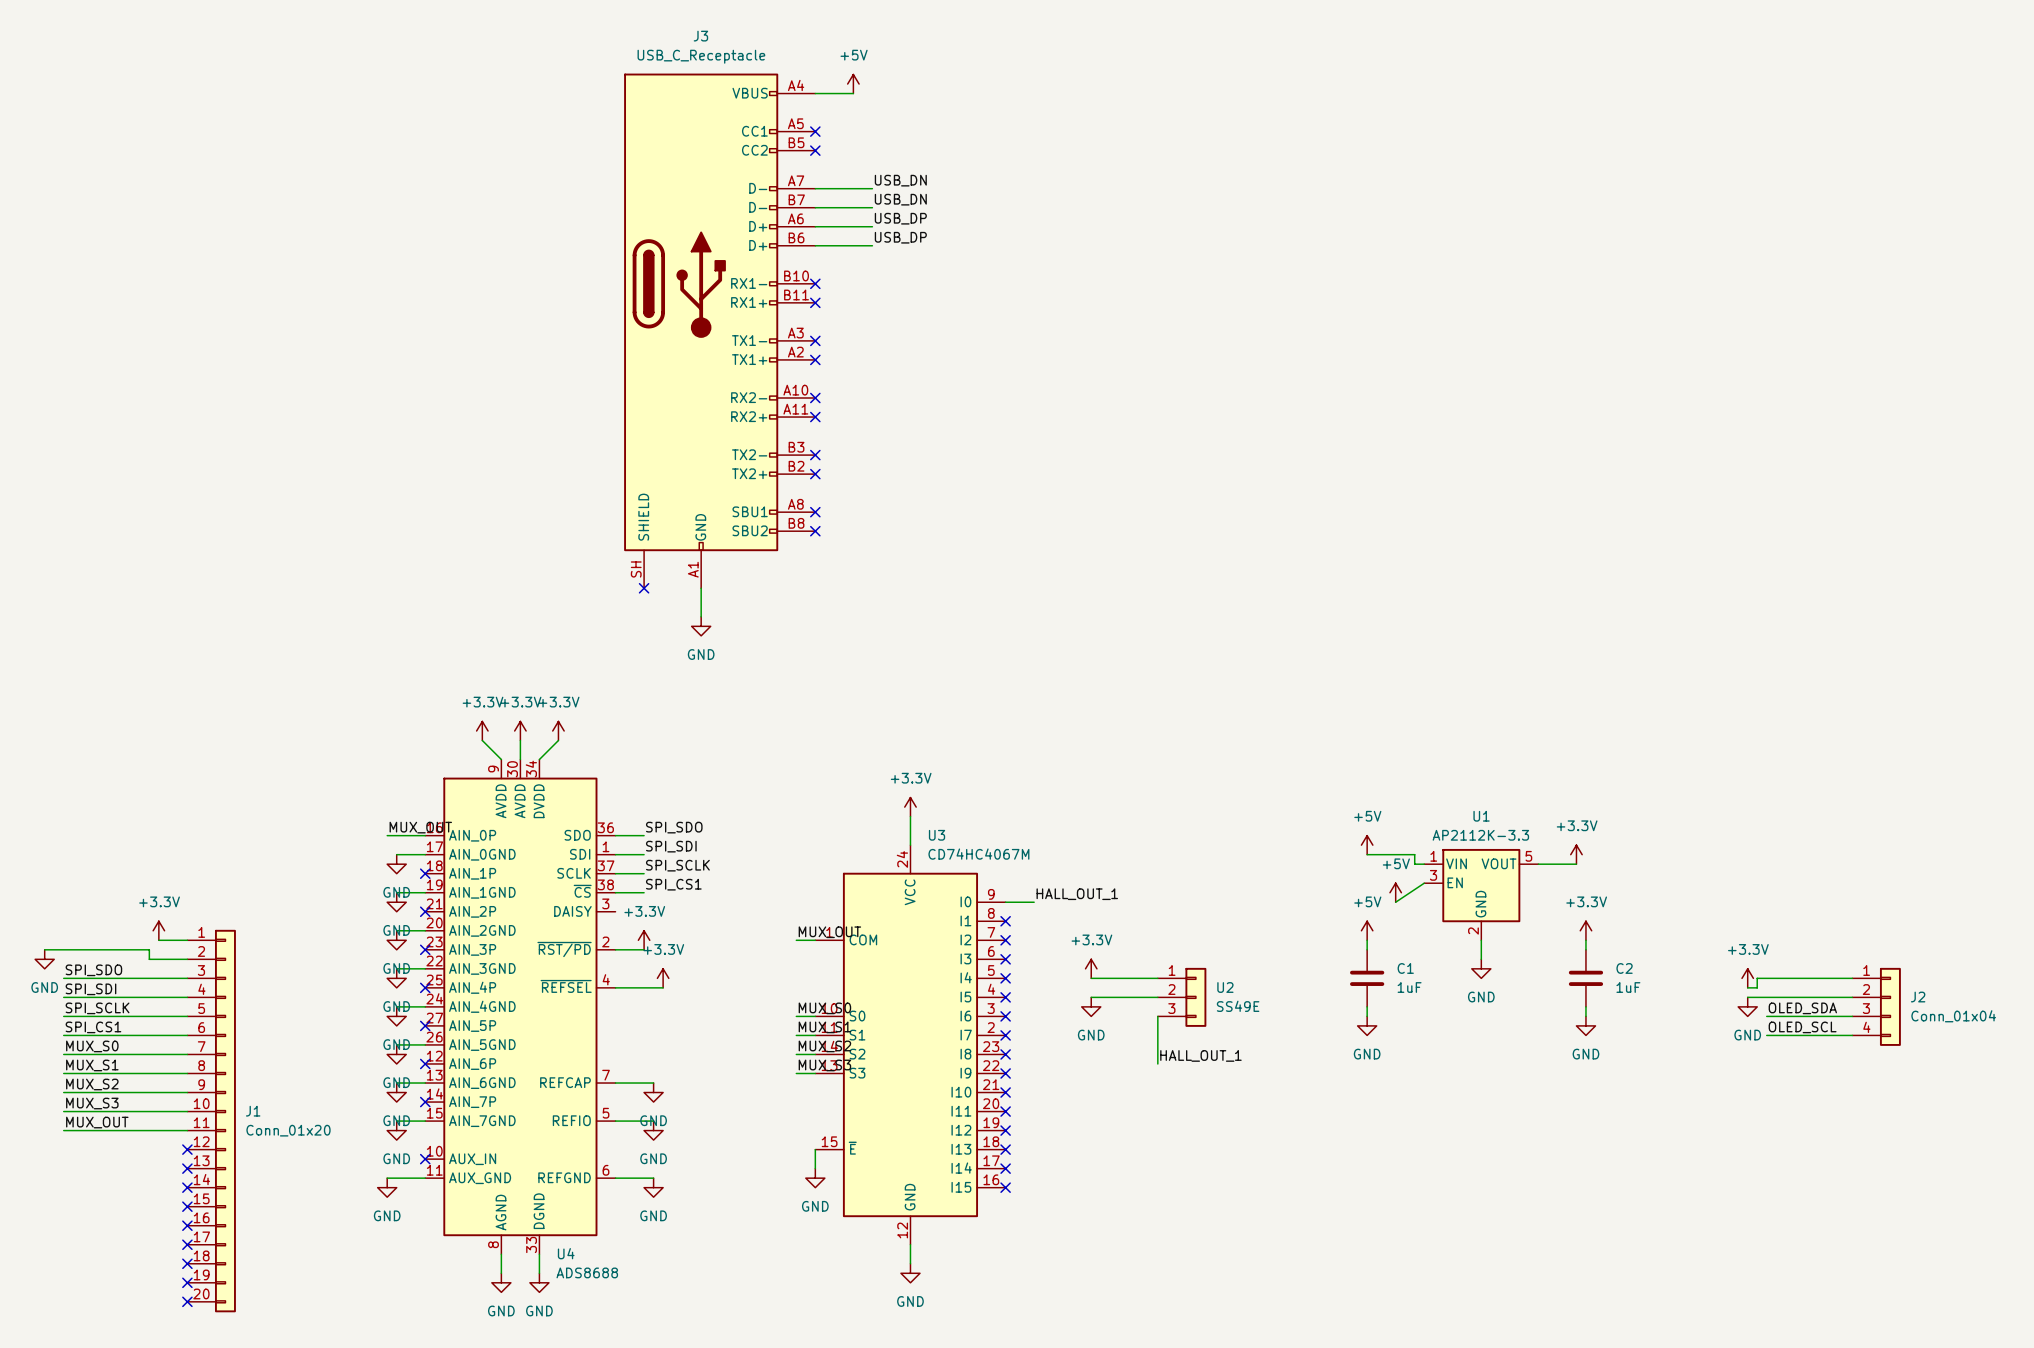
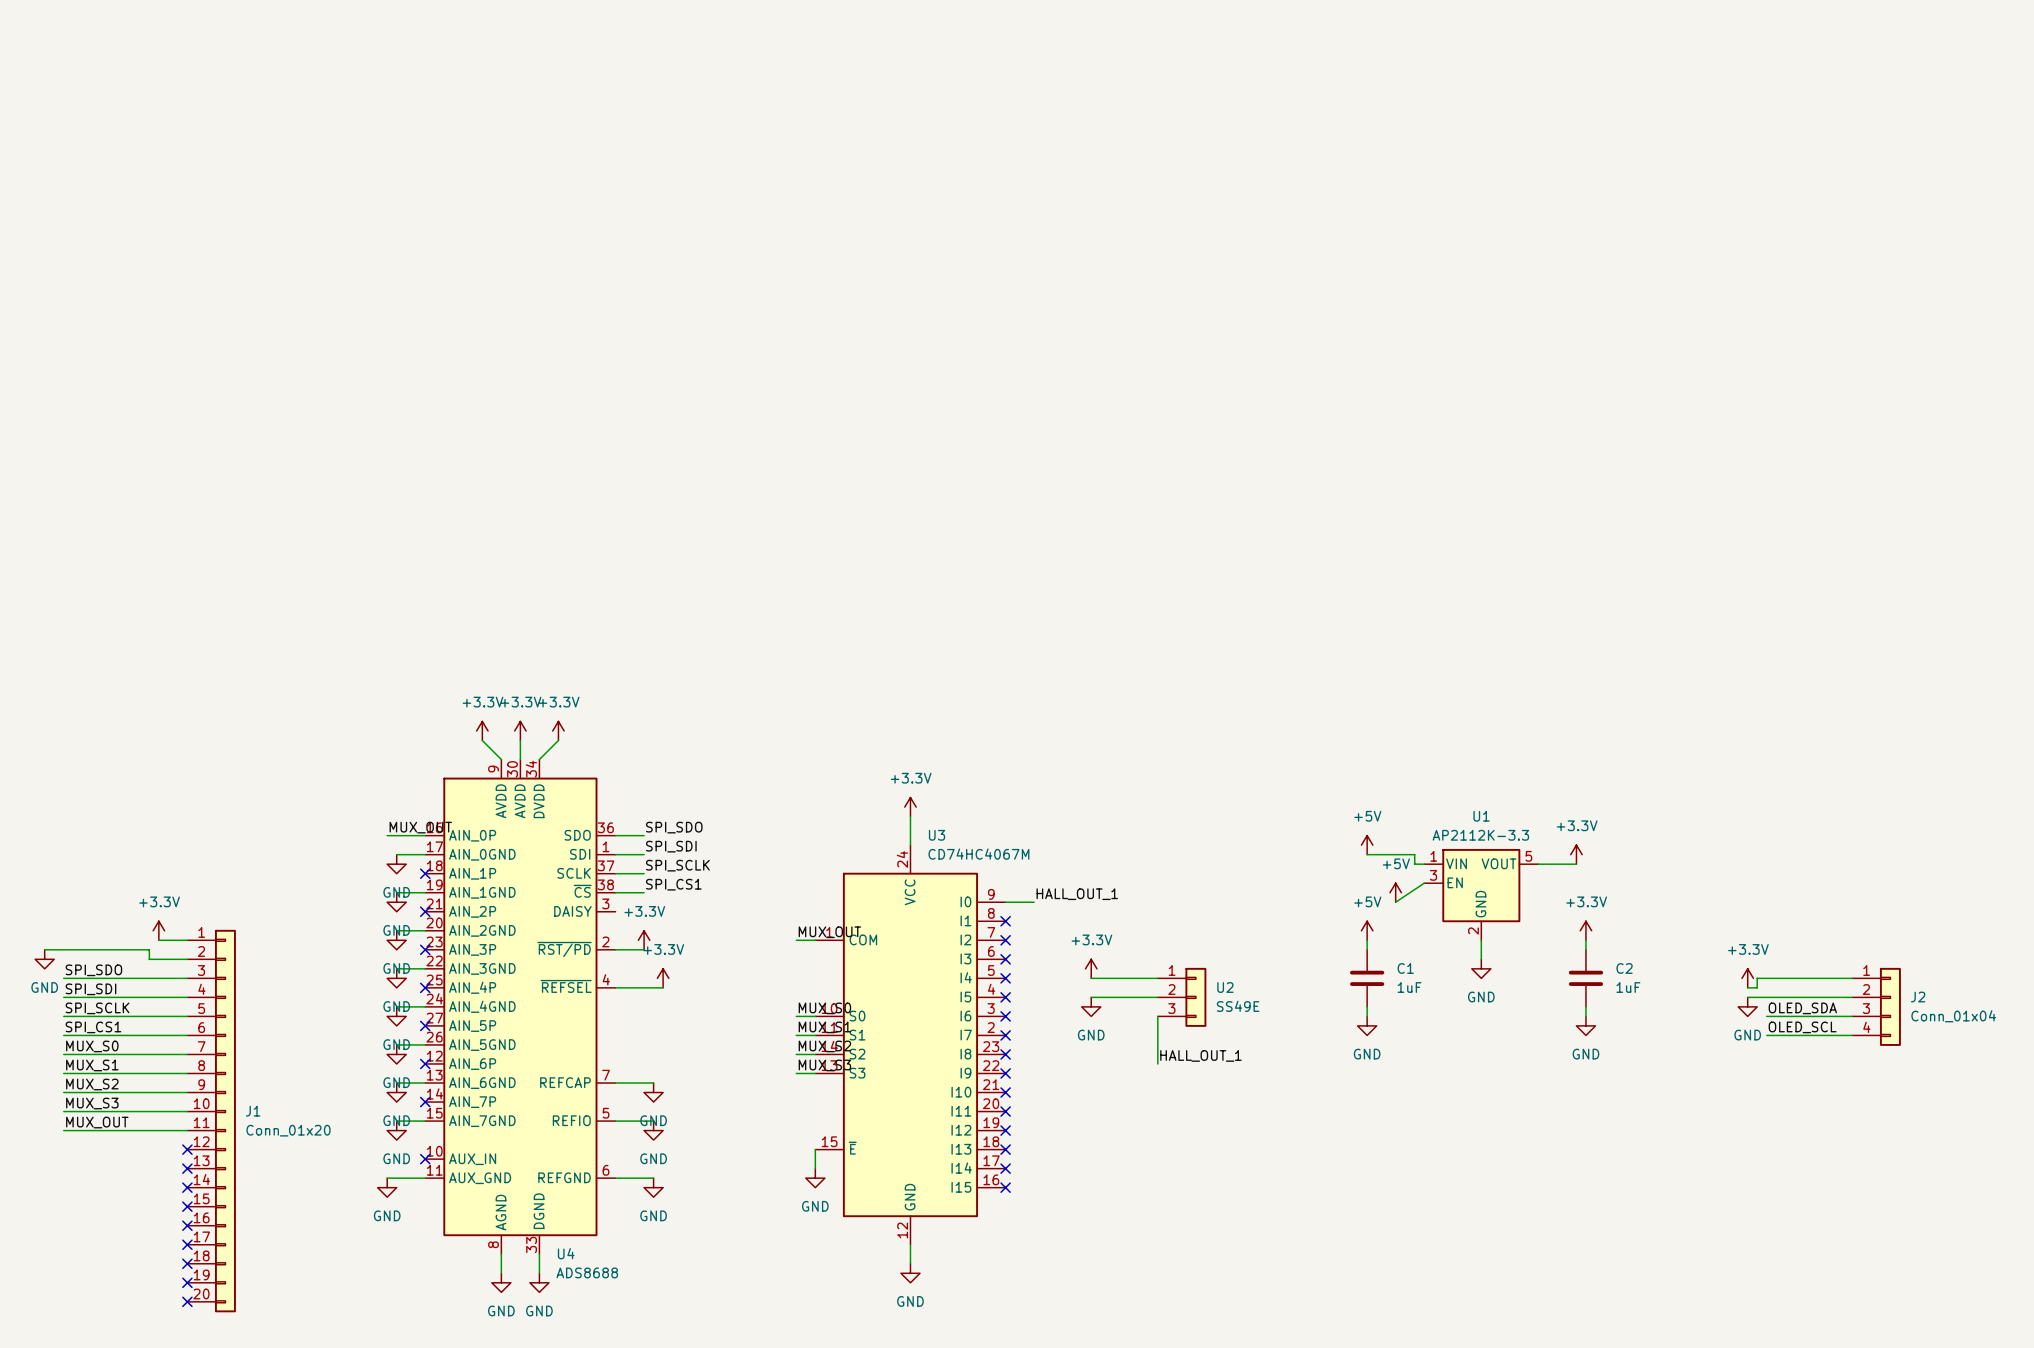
power symbol: +5V (853, 84) -> none
wire: (815, 93) (853, 93) -> none
no-connect mark: (815, 131) -> none
no-connect mark: (815, 150) -> none
label: USB_DN (900, 180) -> none
wire: (815, 188) (872, 188) -> none
label: USB_DN (900, 199) -> none
wire: (815, 207) (872, 207) -> none
label: USB_DP (900, 218) -> none
wire: (815, 226) (872, 226) -> none
label: USB_DP (900, 237) -> none
wire: (815, 245) (872, 245) -> none
no-connect mark: (815, 283) -> none
no-connect mark: (815, 302) -> none
J3: USB_C_Receptacle (719, 330) -> none
no-connect mark: (815, 340) -> none
no-connect mark: (815, 359) -> none
no-connect mark: (815, 397) -> none
no-connect mark: (815, 417) -> none
no-connect mark: (815, 455) -> none
no-connect mark: (815, 474) -> none
no-connect mark: (815, 512) -> none
no-connect mark: (815, 531) -> none
no-connect mark: (644, 588) -> none
wire: (701, 588) (701, 616) -> none
power symbol: GND (701, 626) -> none

